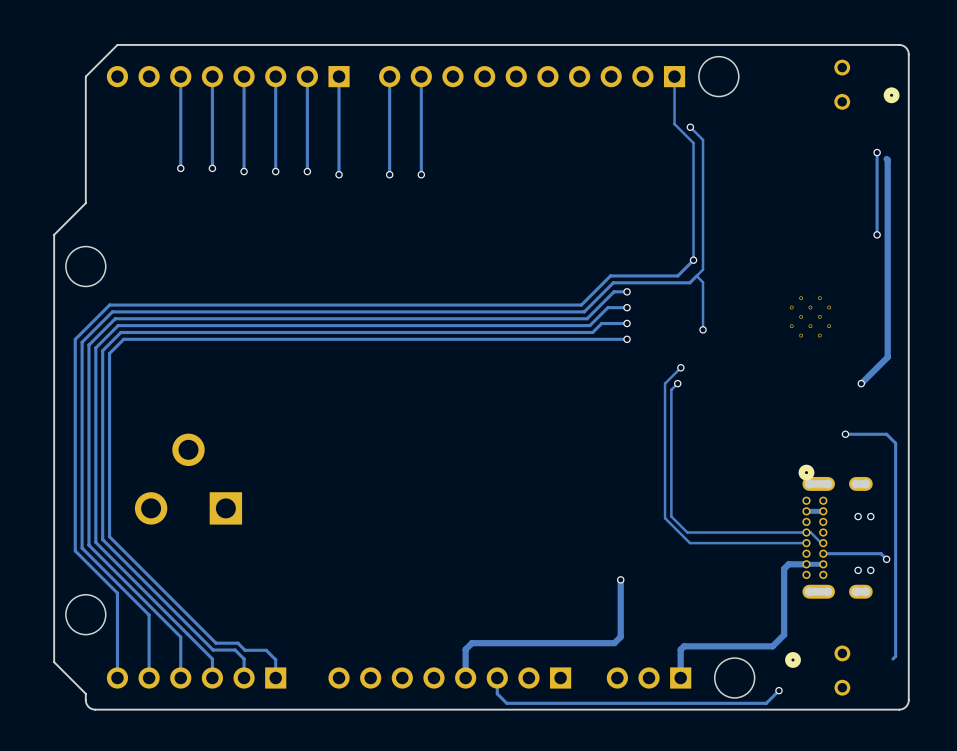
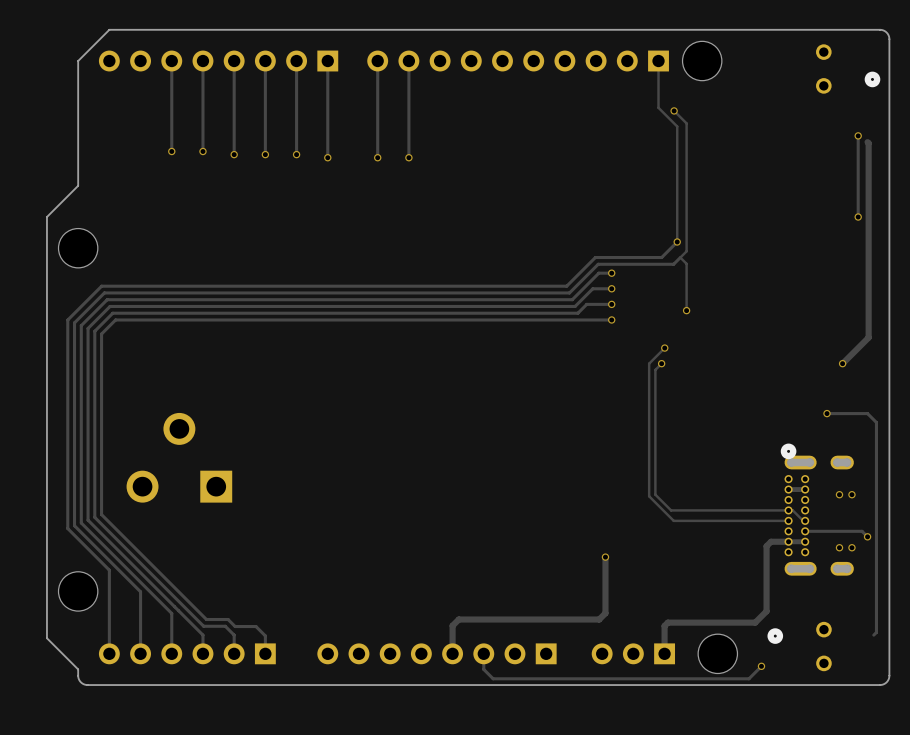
part: (810, 316) -> none

